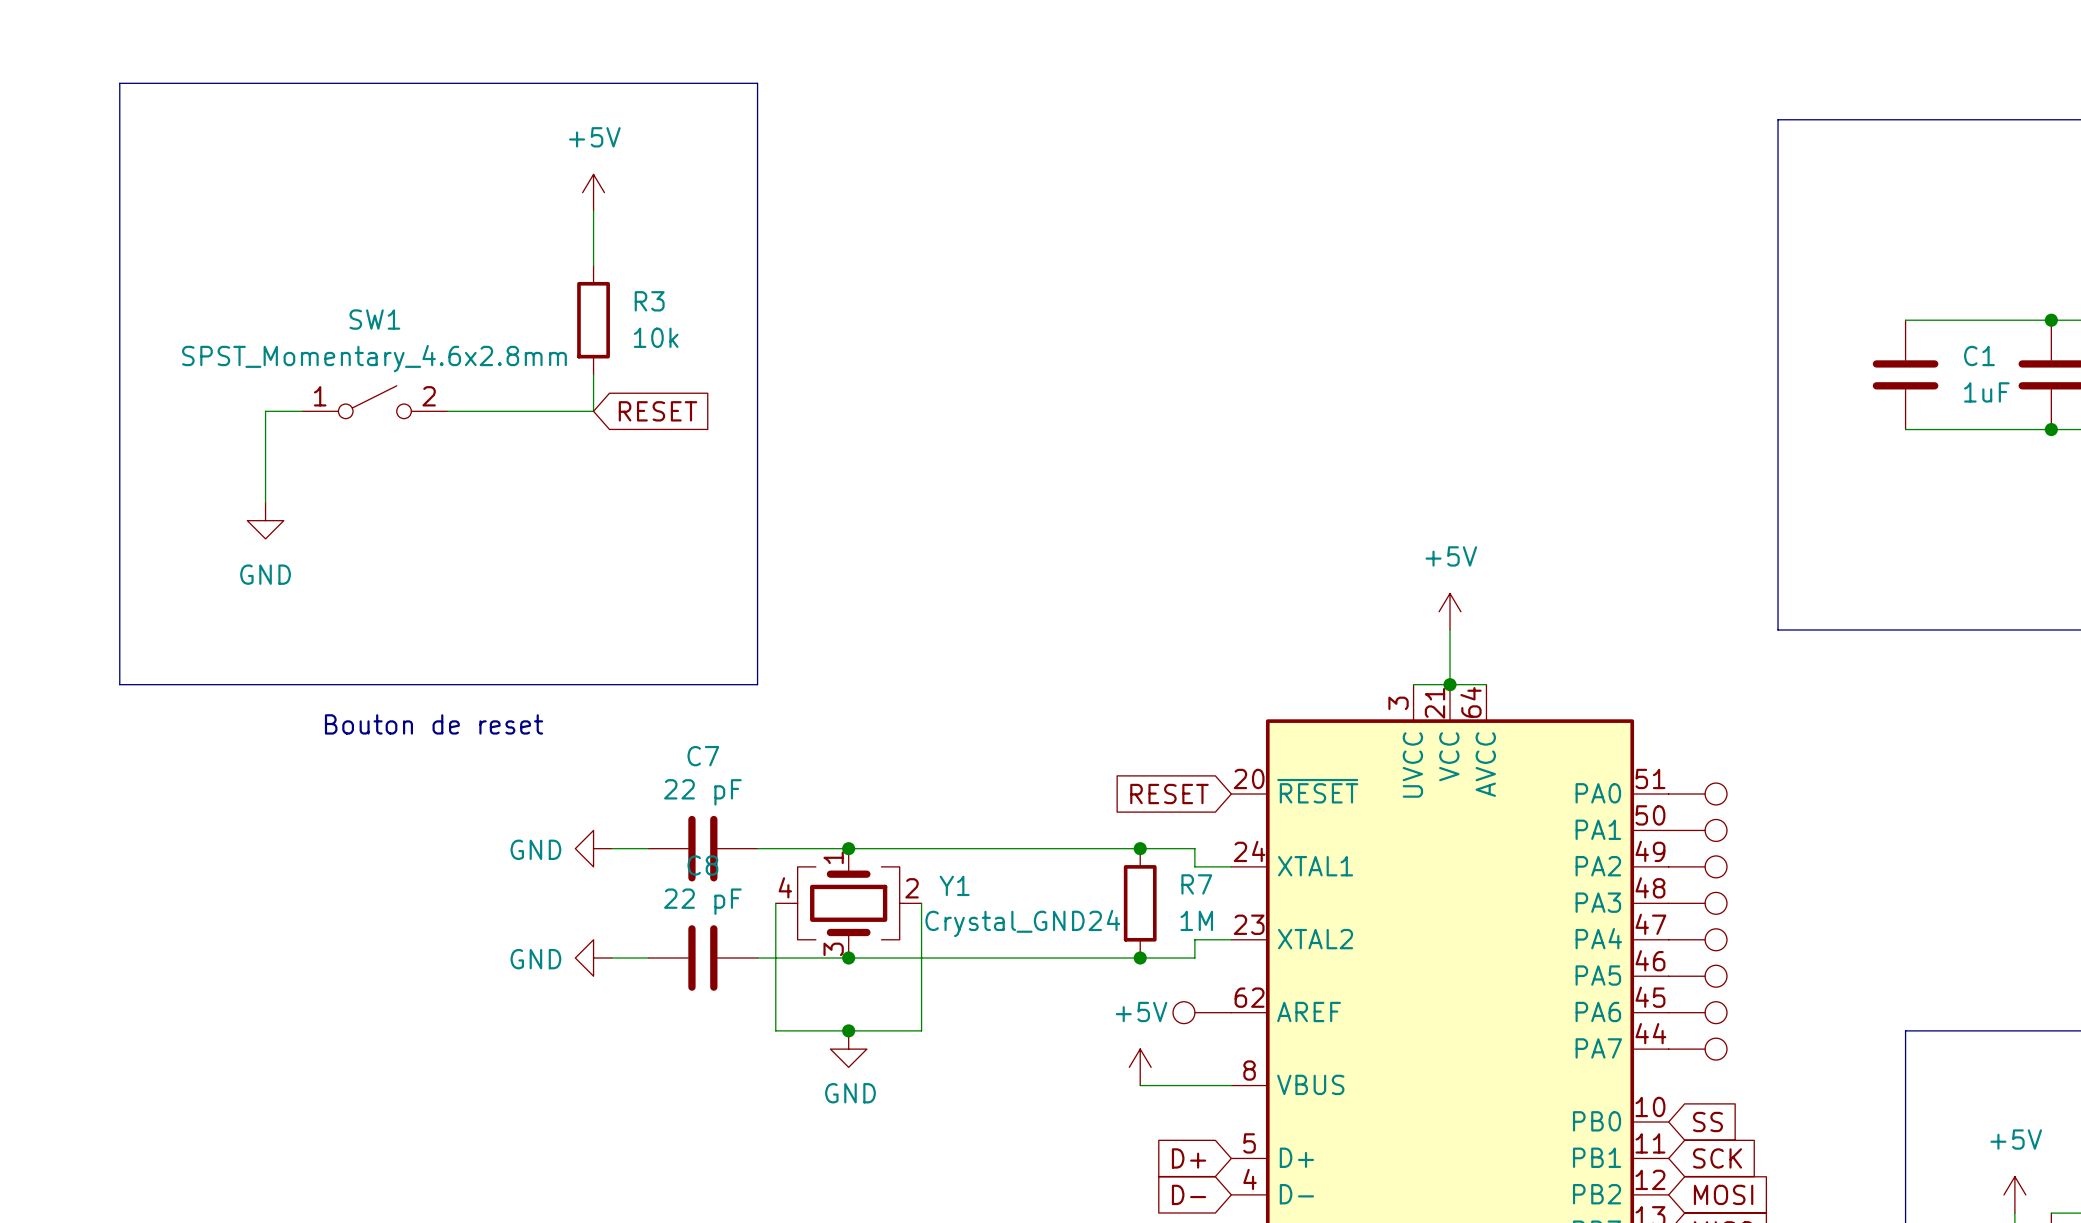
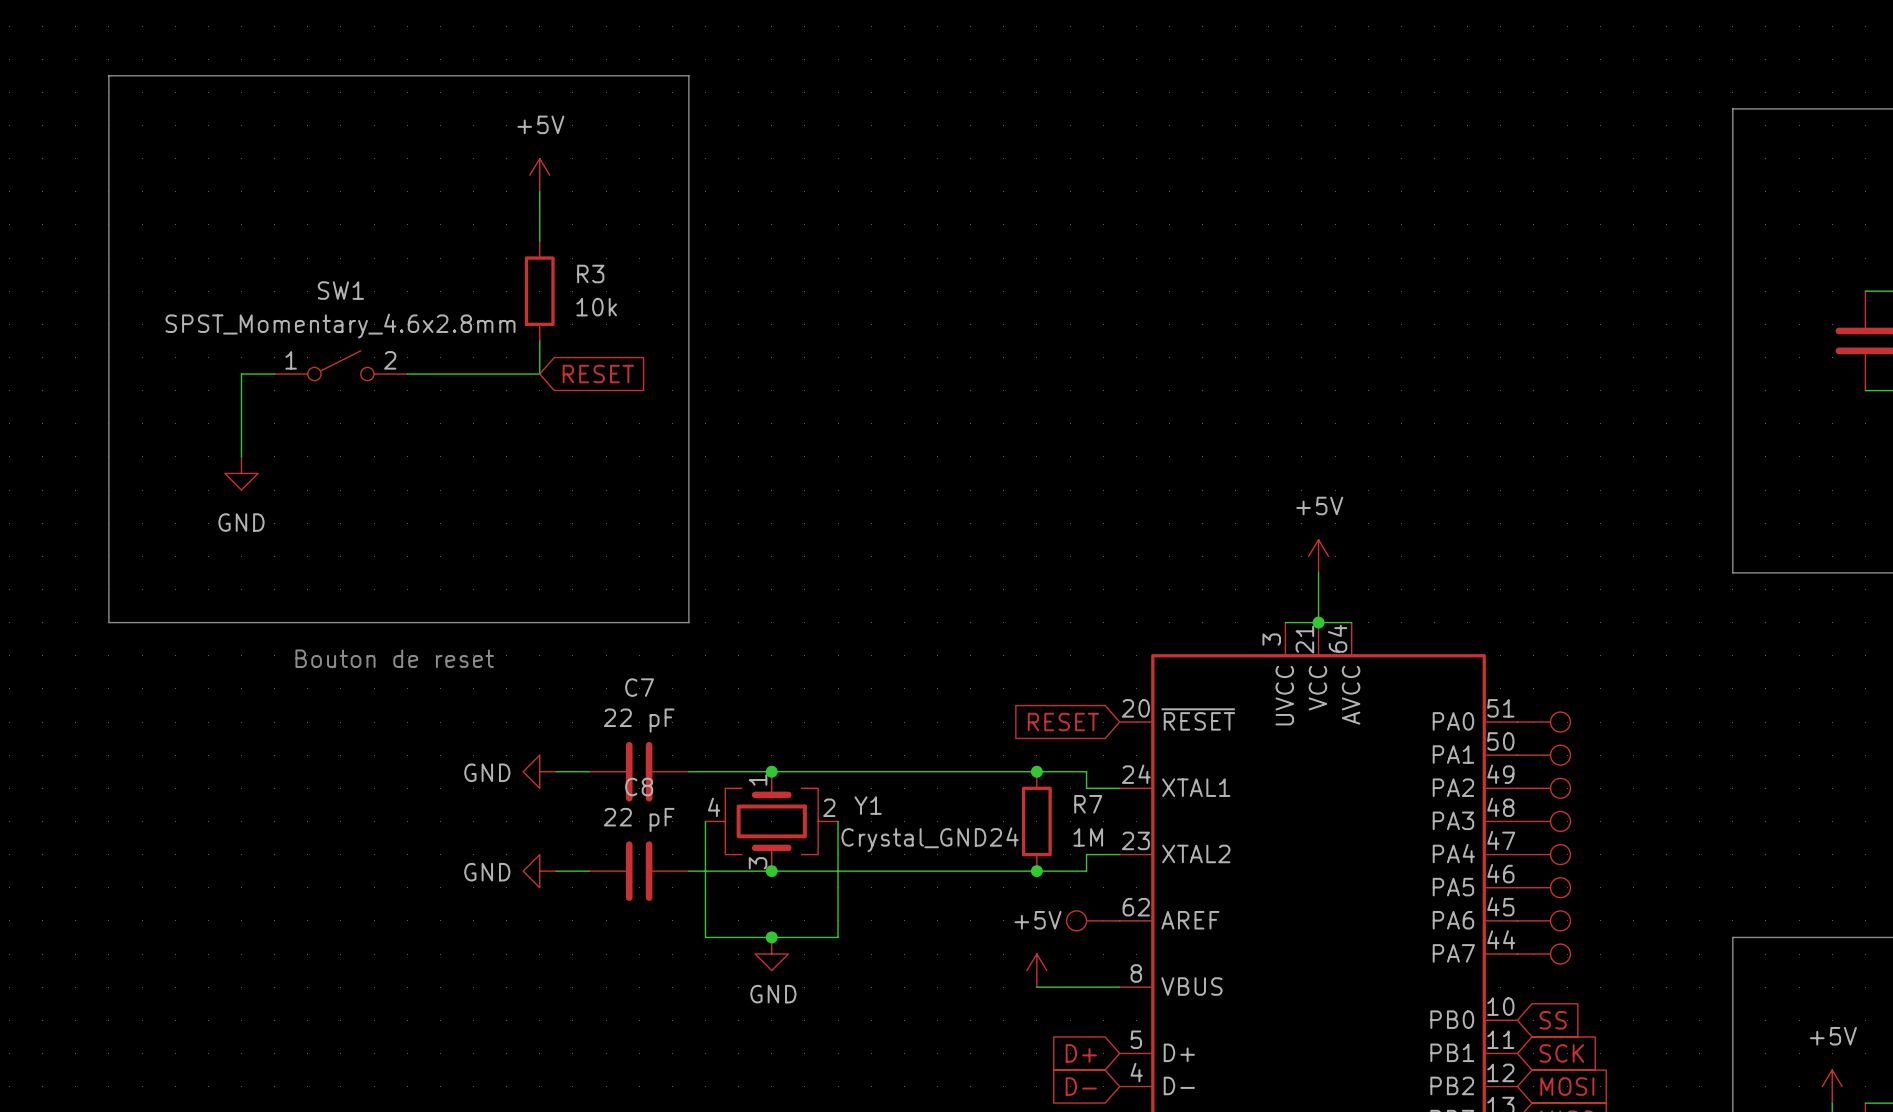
line: (1905, 119) (1778, 119) (1778, 630) (1905, 630) -> (1732, 108) (1732, 572)
wire: (1905, 320) (2051, 320) -> none
junction: (2051, 320) -> none
C1: 1uF (1905, 374) -> none
wire: (1905, 429) (2051, 429) -> none
junction: (2051, 429) -> none

